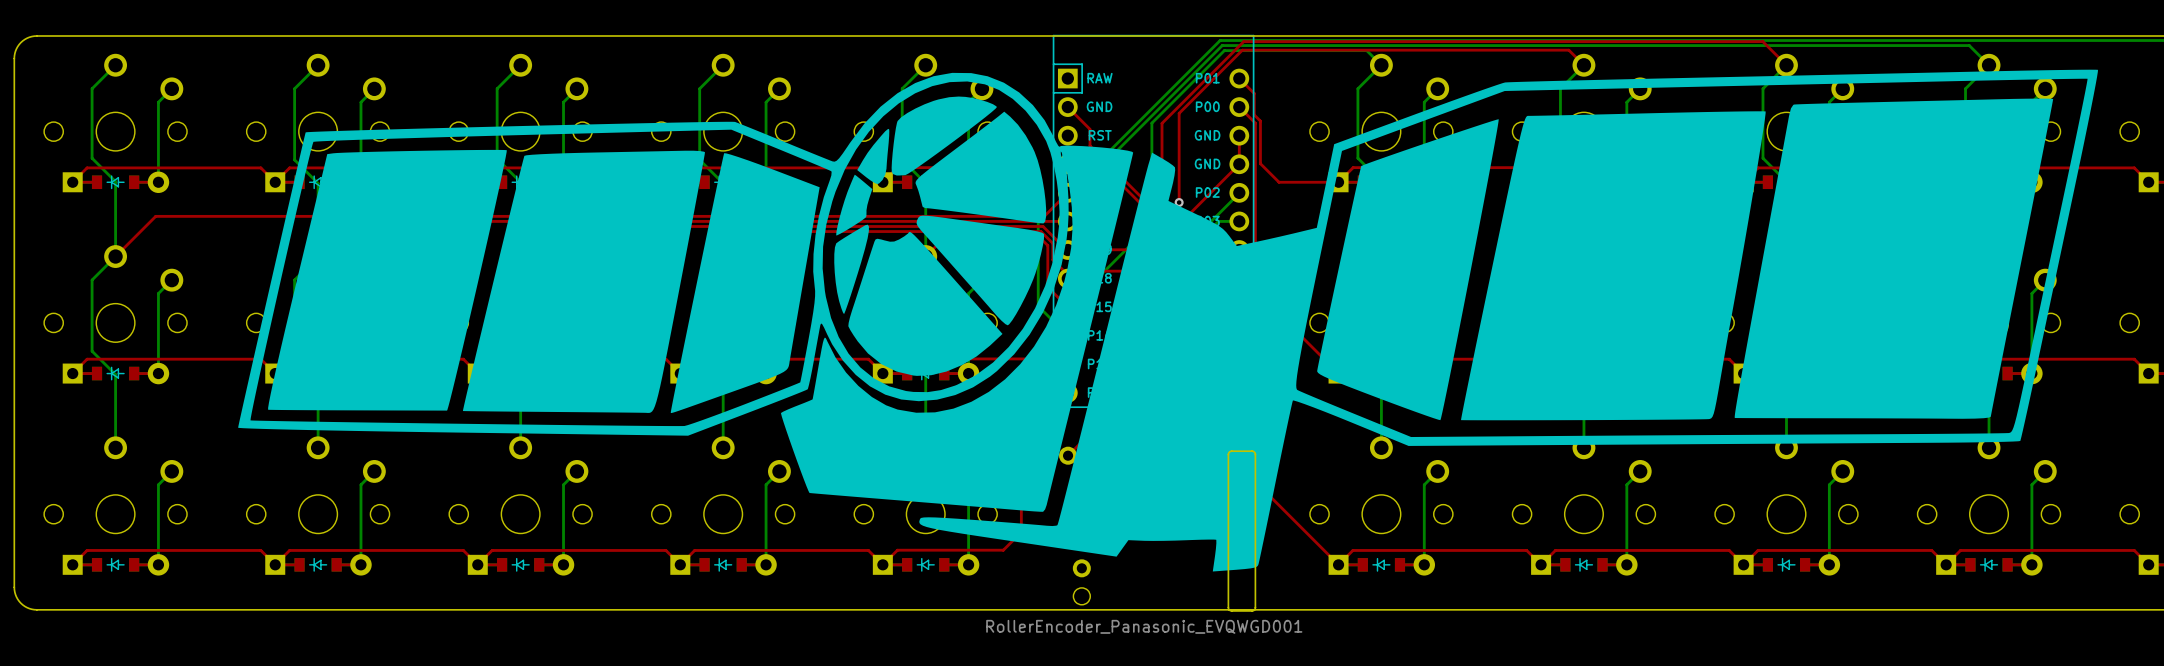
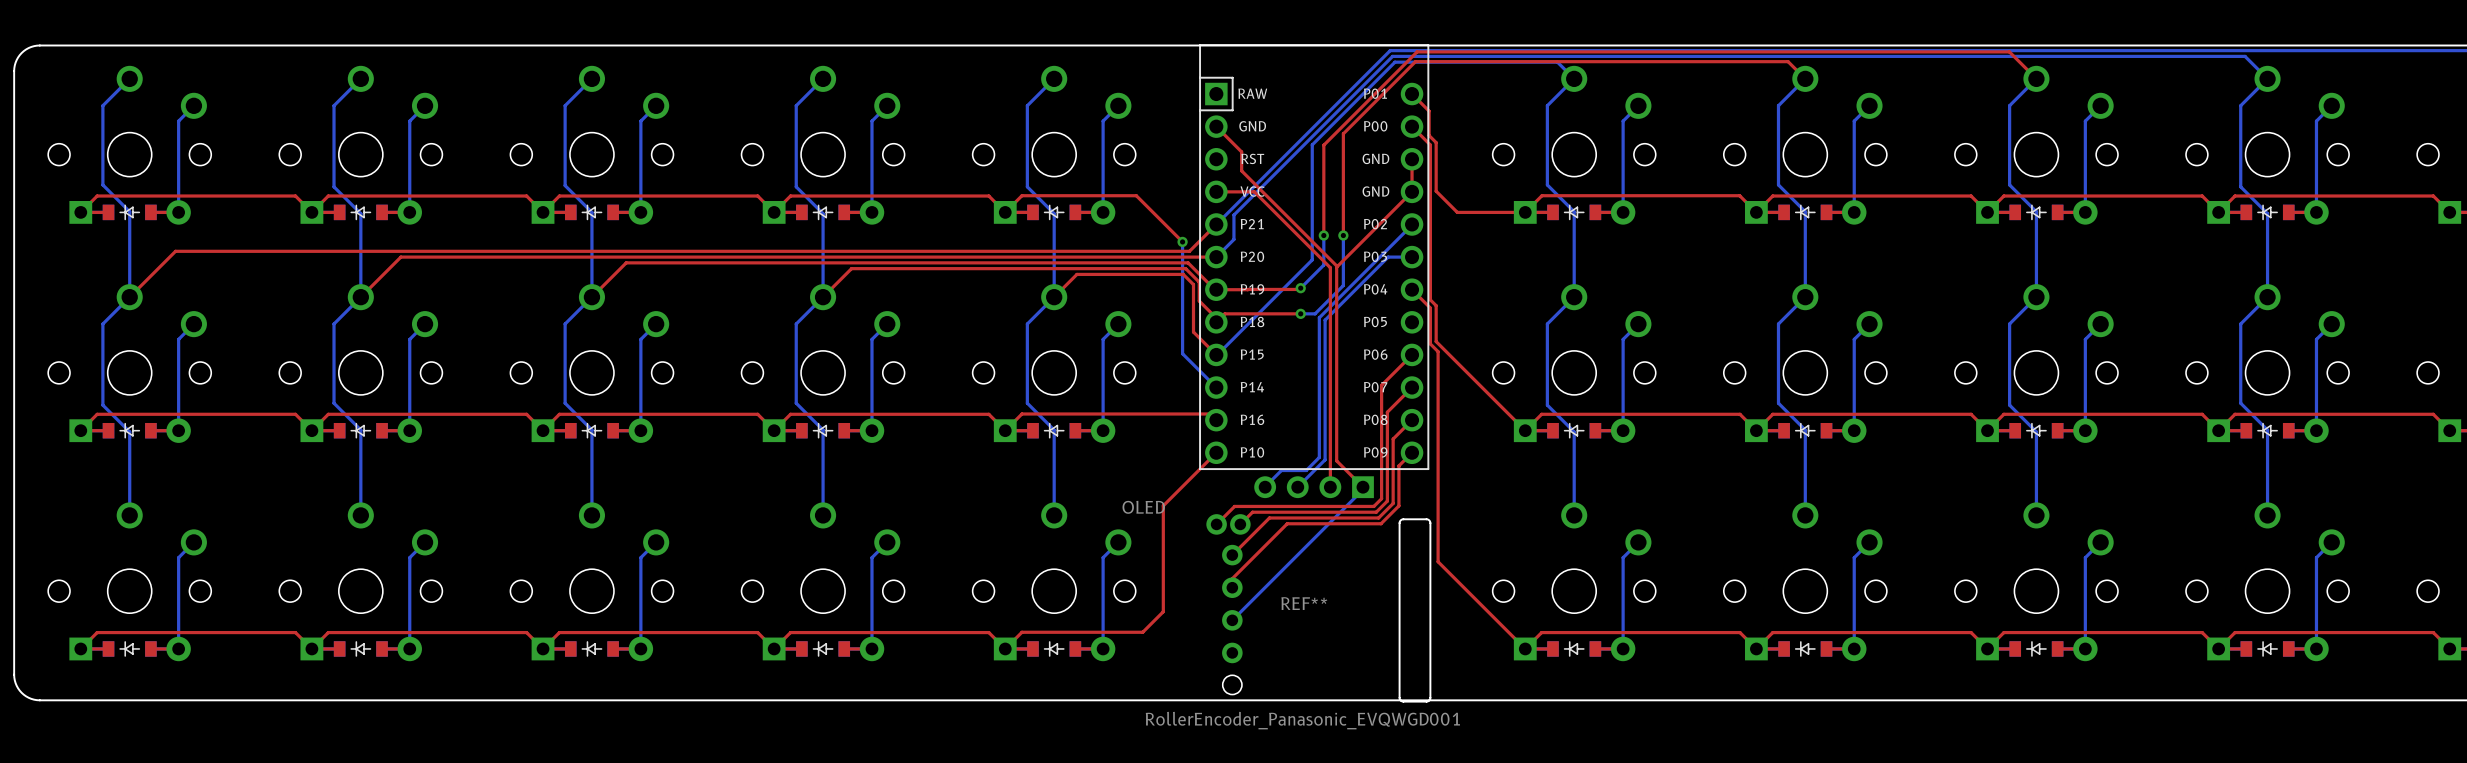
part: (1168, 320) -> none

